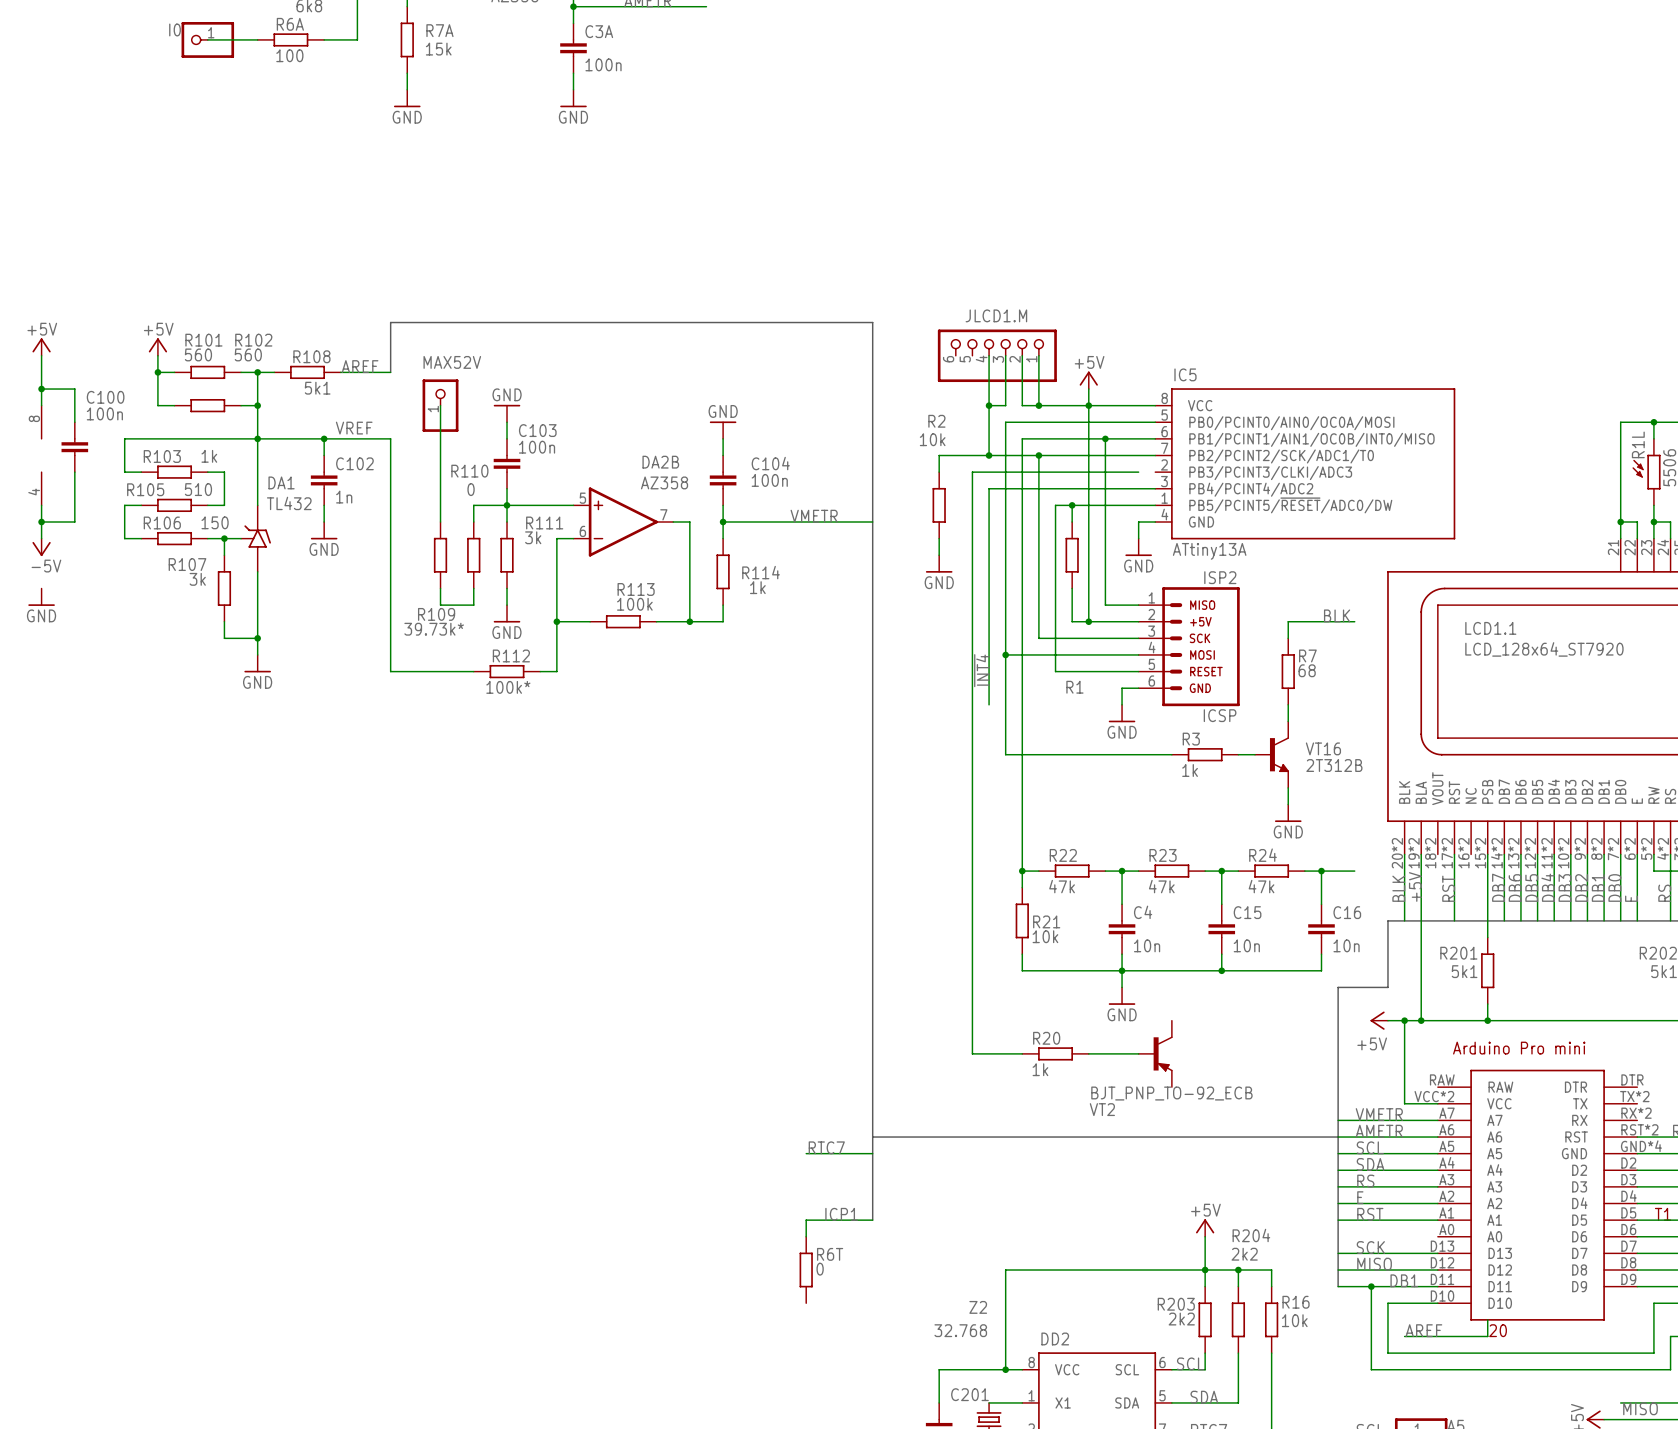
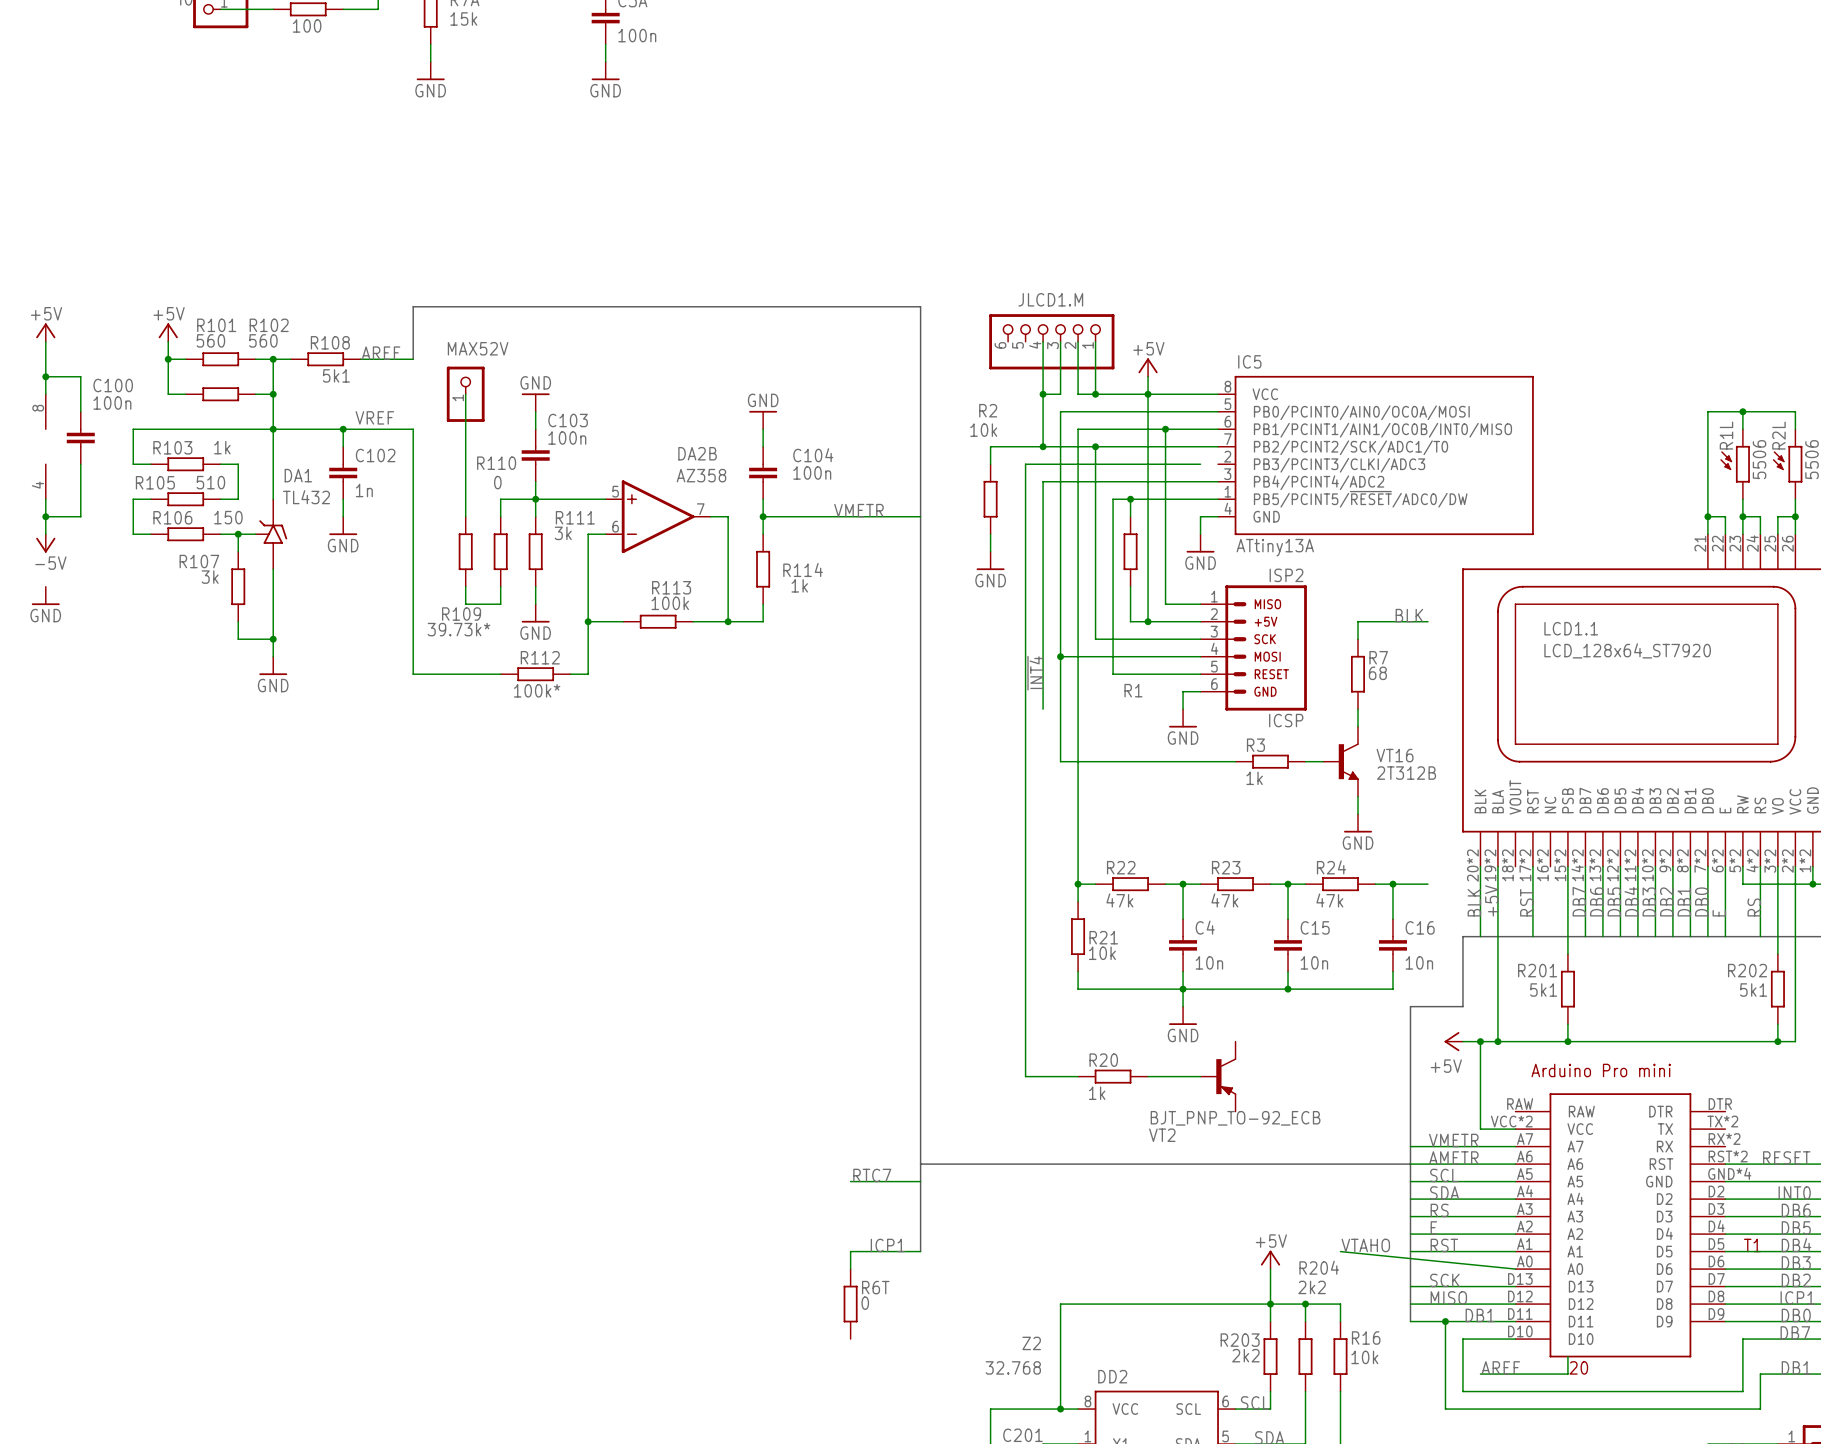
label: none -> VTAHO (1365, 1245)
wire: none -> (1340, 1251) (1515, 1269)

